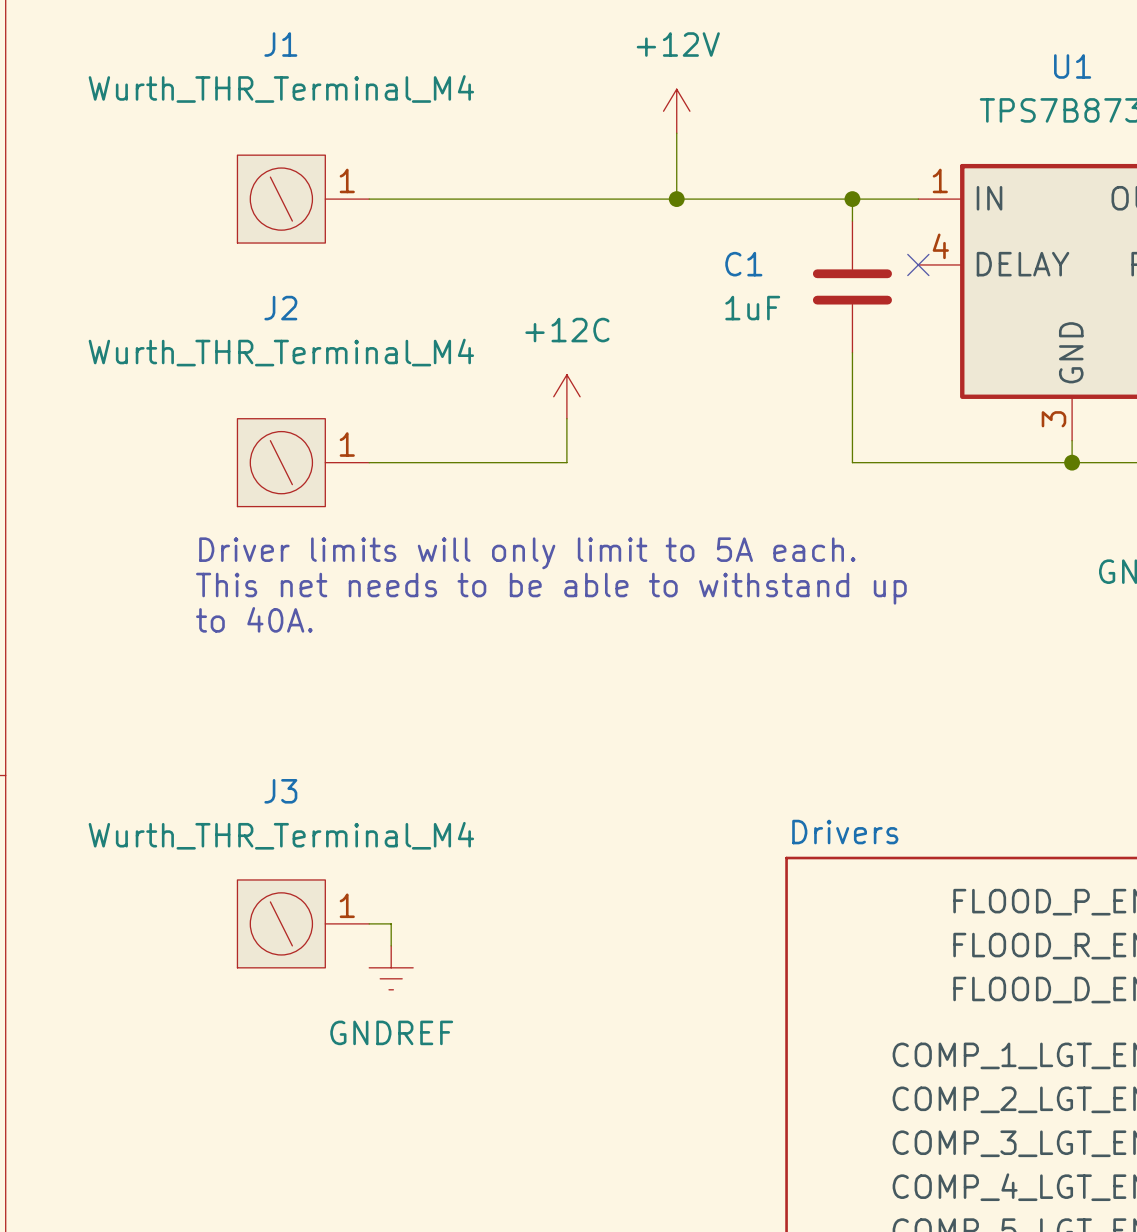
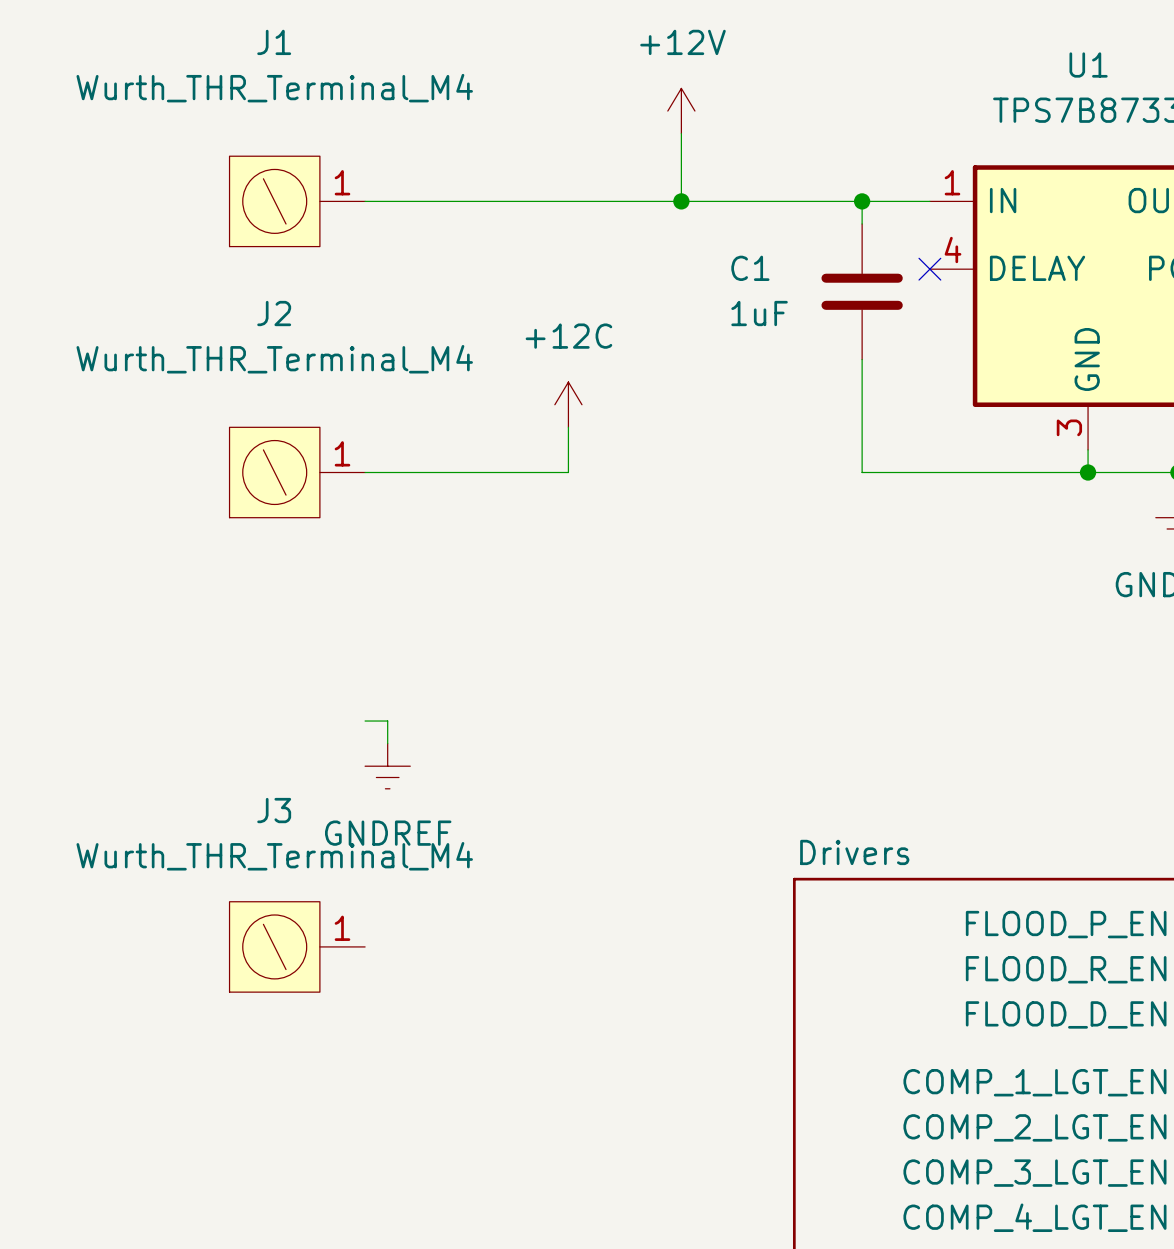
text: Driver limits will only limit to 5A each. (527, 553) -> none
text: This net needs to be able to withstand up (551, 588) -> none
text: to 40A. (254, 619) -> none
wire: (369, 923) (391, 923) (391, 945) -> (365, 721) (387, 721) (387, 743)
power symbol position: GNDREF (391, 967) -> GNDREF (387, 766)

